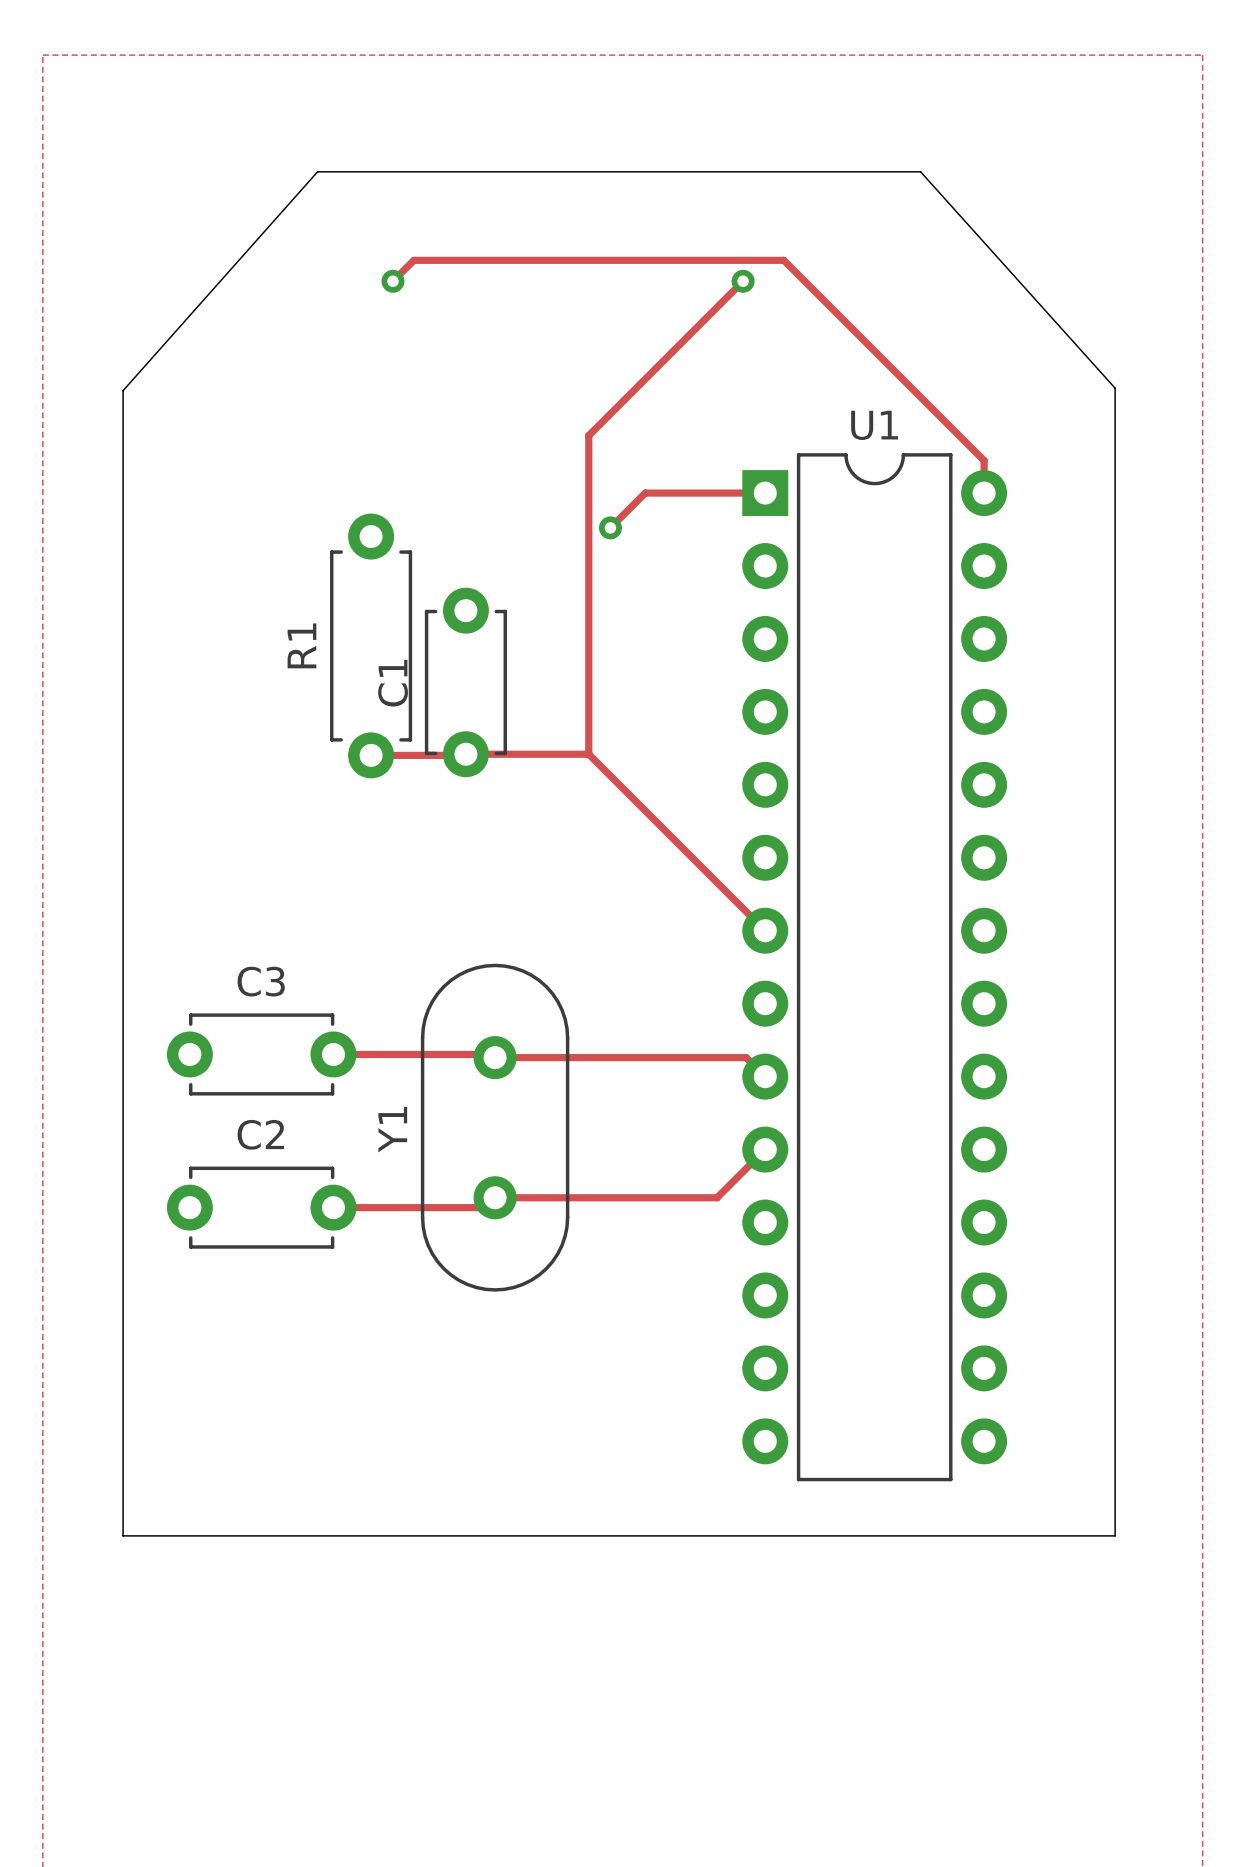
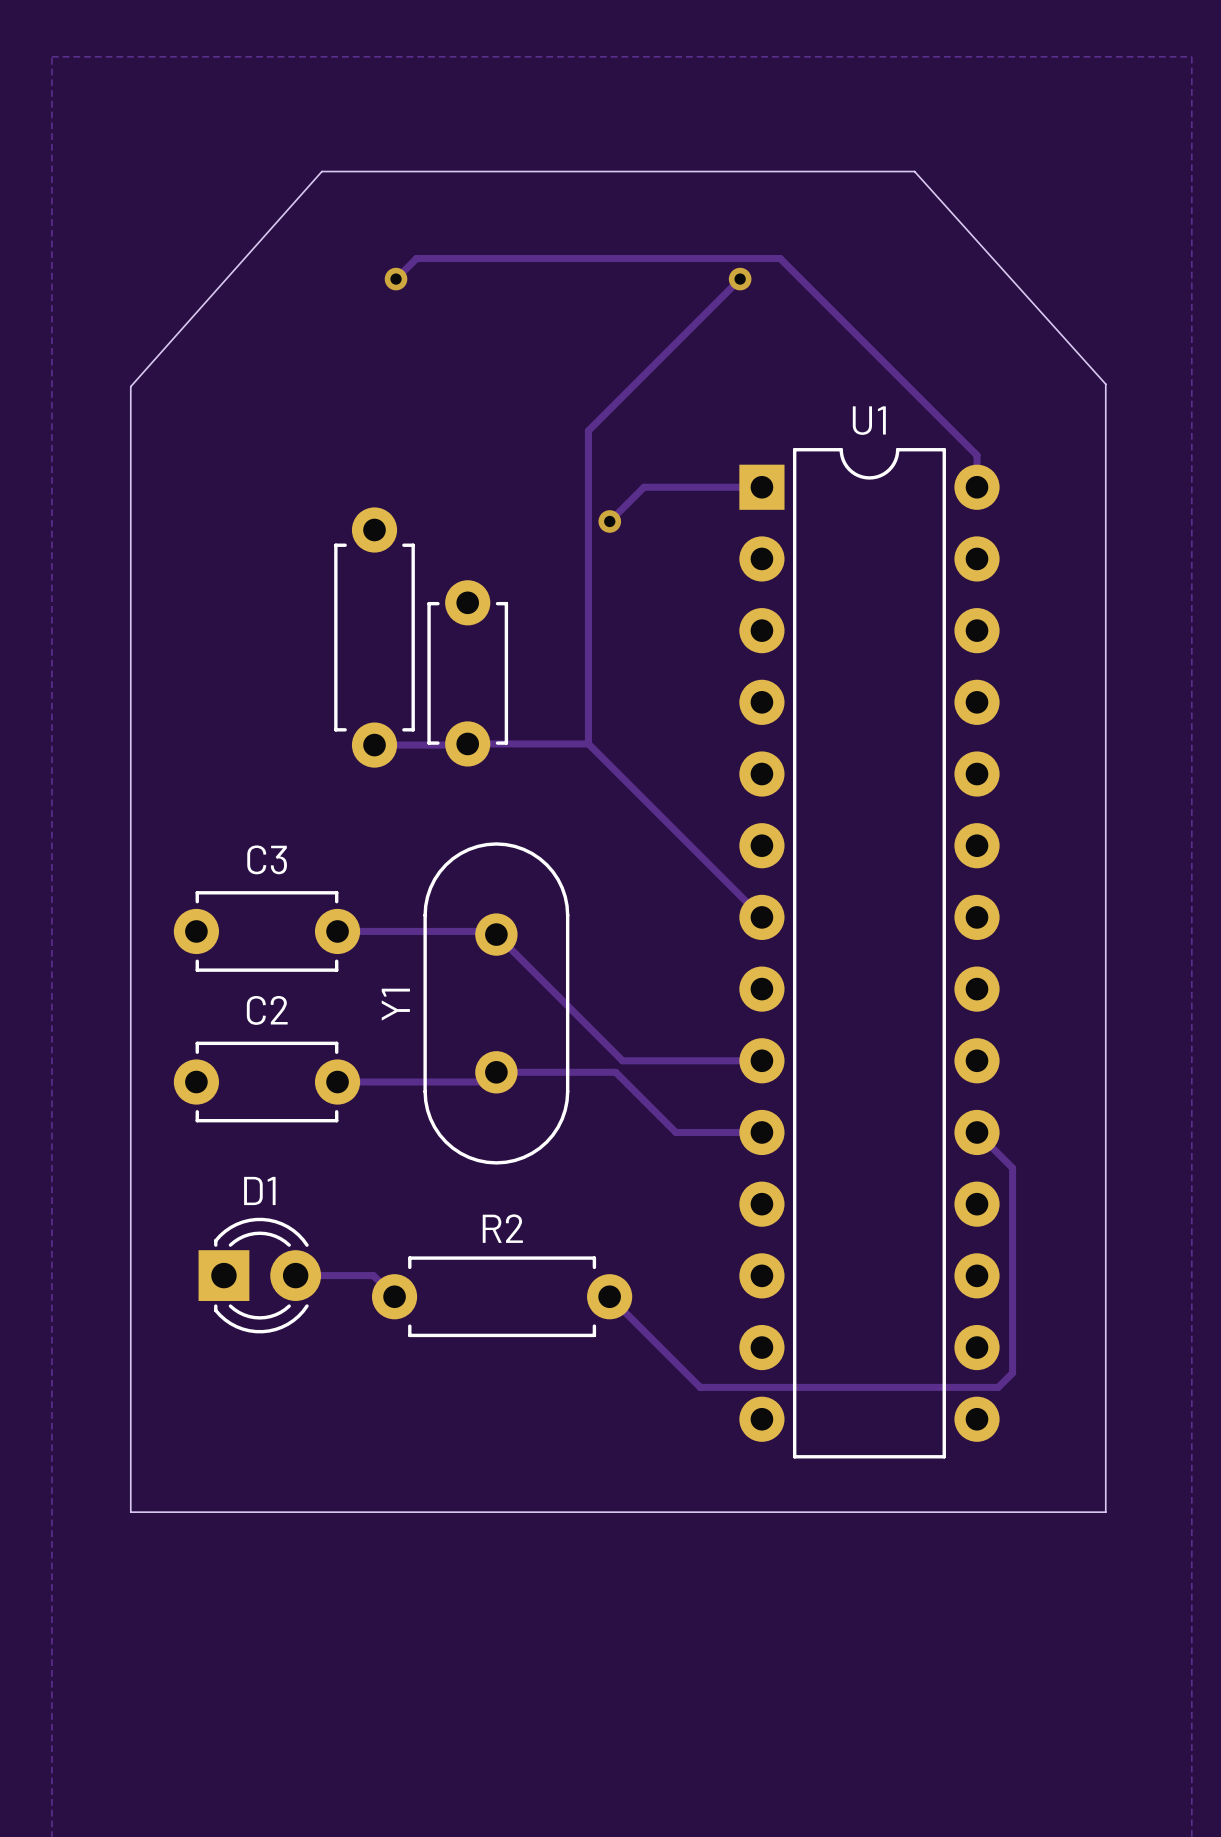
R1 name: R1 (301, 645) -> none
C1 name: C1 (393, 683) -> none
C3 position: (261, 1054) -> (266, 931)
track: (333, 1054) (491, 1054) -> (337, 931) (493, 931)
track: (495, 1057) (746, 1057) (765, 1076) -> (496, 934) (622, 1060) (761, 1060)
Y1 position: (495, 1127) -> (496, 1003)
track: (765, 1149) (717, 1197) (495, 1197) -> (761, 1132) (675, 1132) (615, 1072) (496, 1072)
track: none -> (977, 1132) (1012, 1168) (1012, 1373) (998, 1387) (700, 1387) (609, 1296)
C2 position: (261, 1207) -> (266, 1082)
track: (333, 1207) (485, 1207) -> (337, 1082) (486, 1082)
D1: none -> (259, 1275)
track: none -> (295, 1275) (373, 1275) (394, 1296)
R2: none -> (502, 1296)

